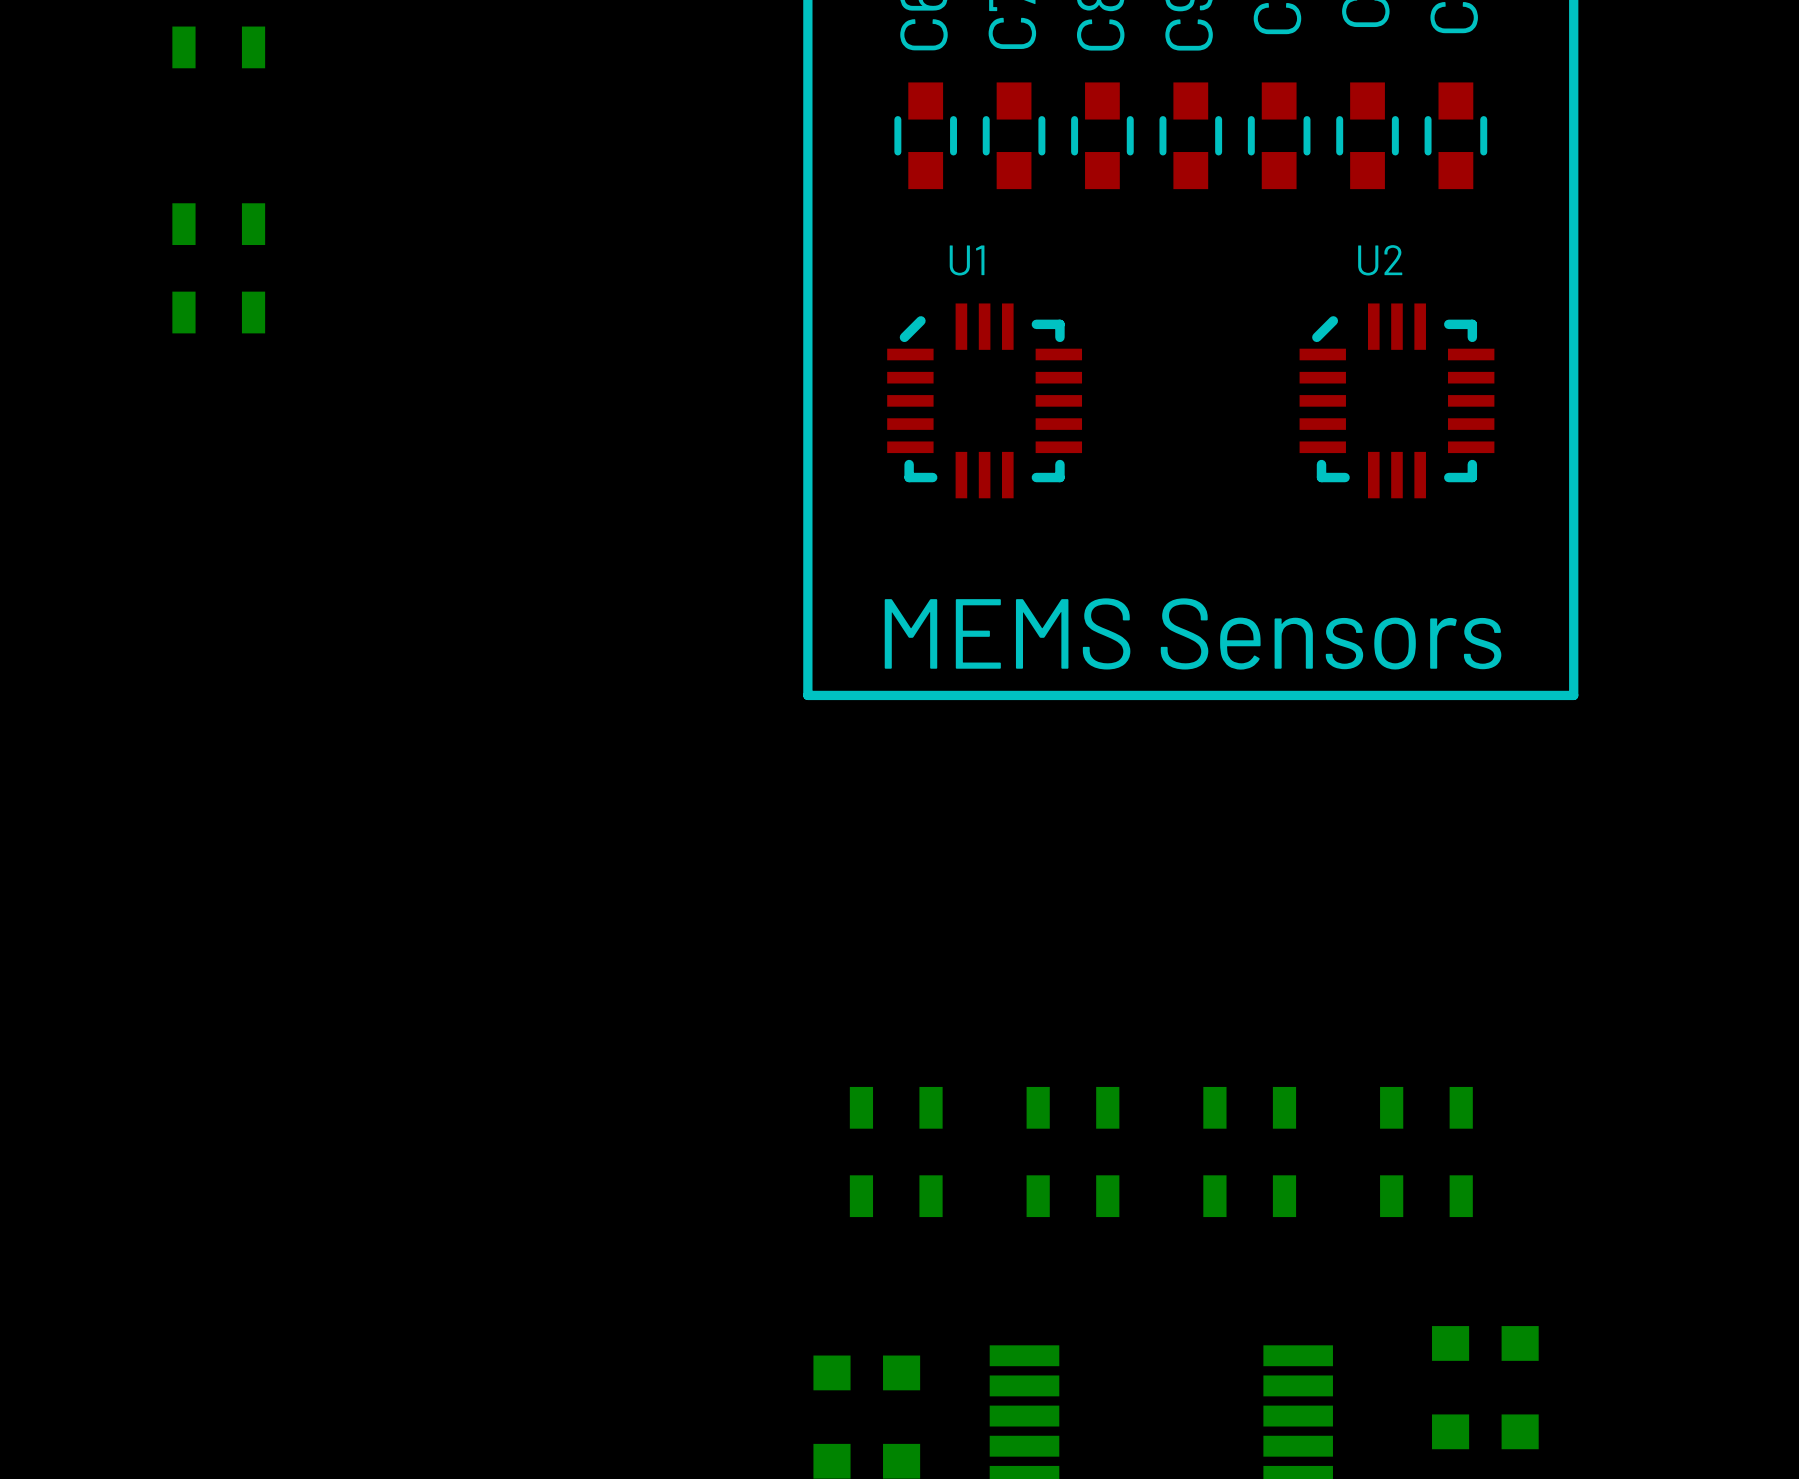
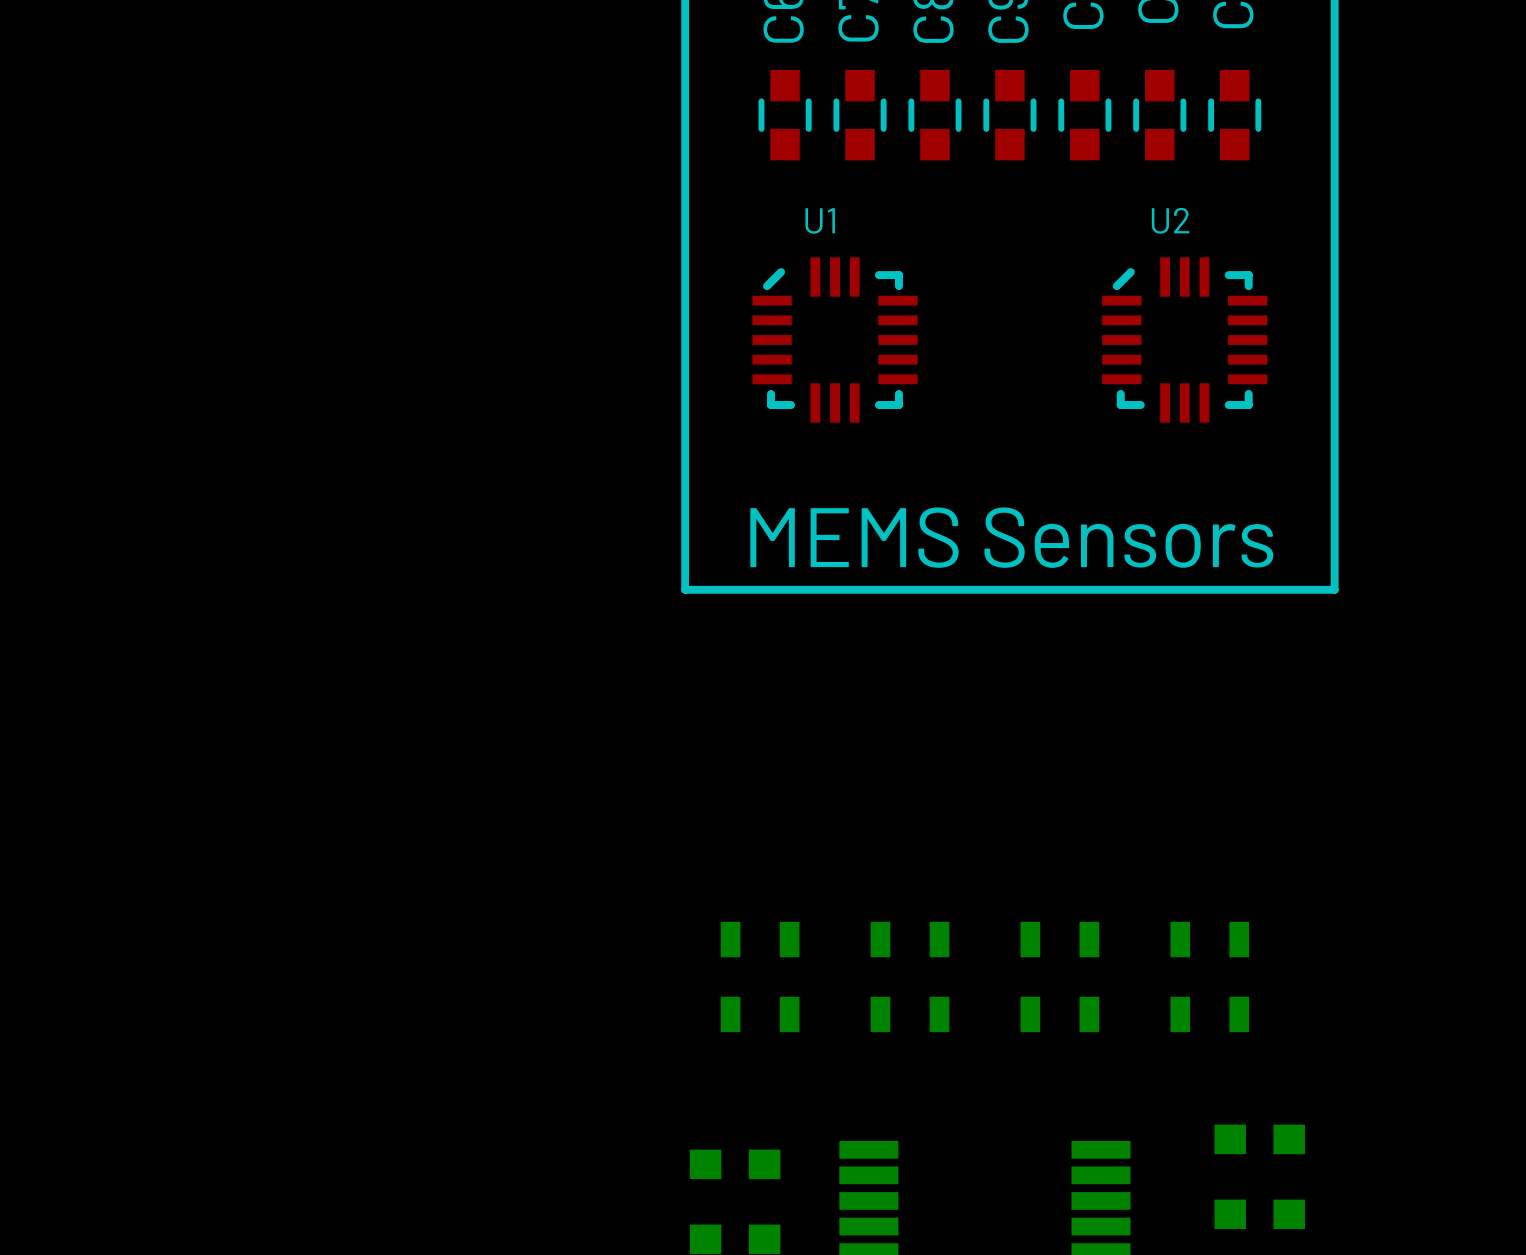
part: (218, 47) -> none
part: (218, 224) -> none
part: (218, 312) -> none

